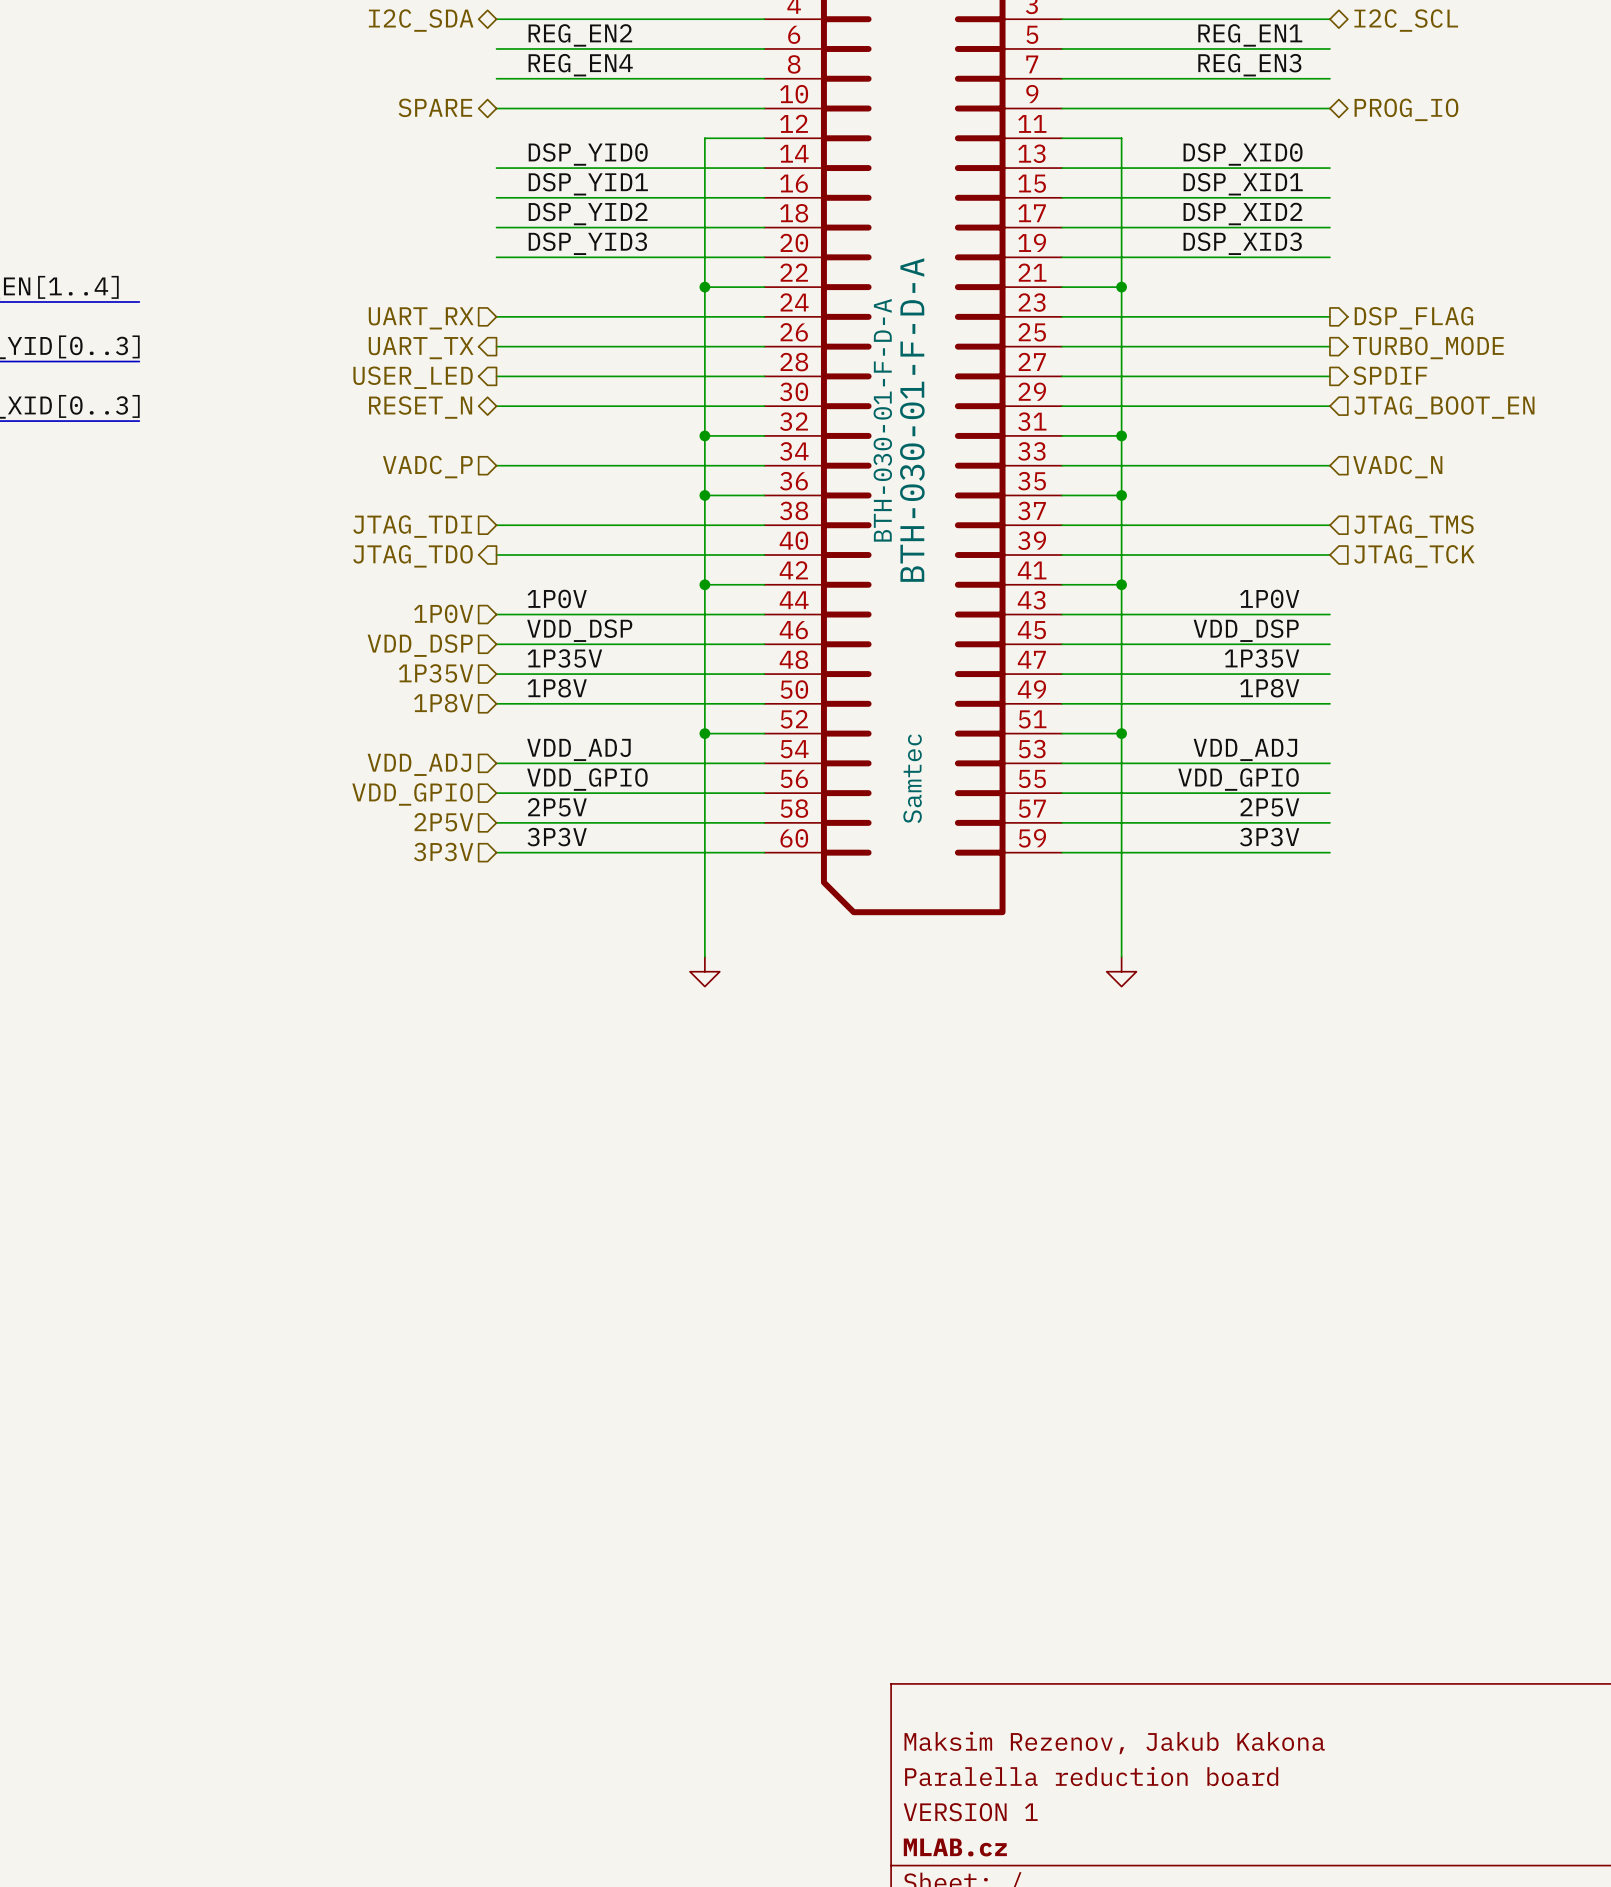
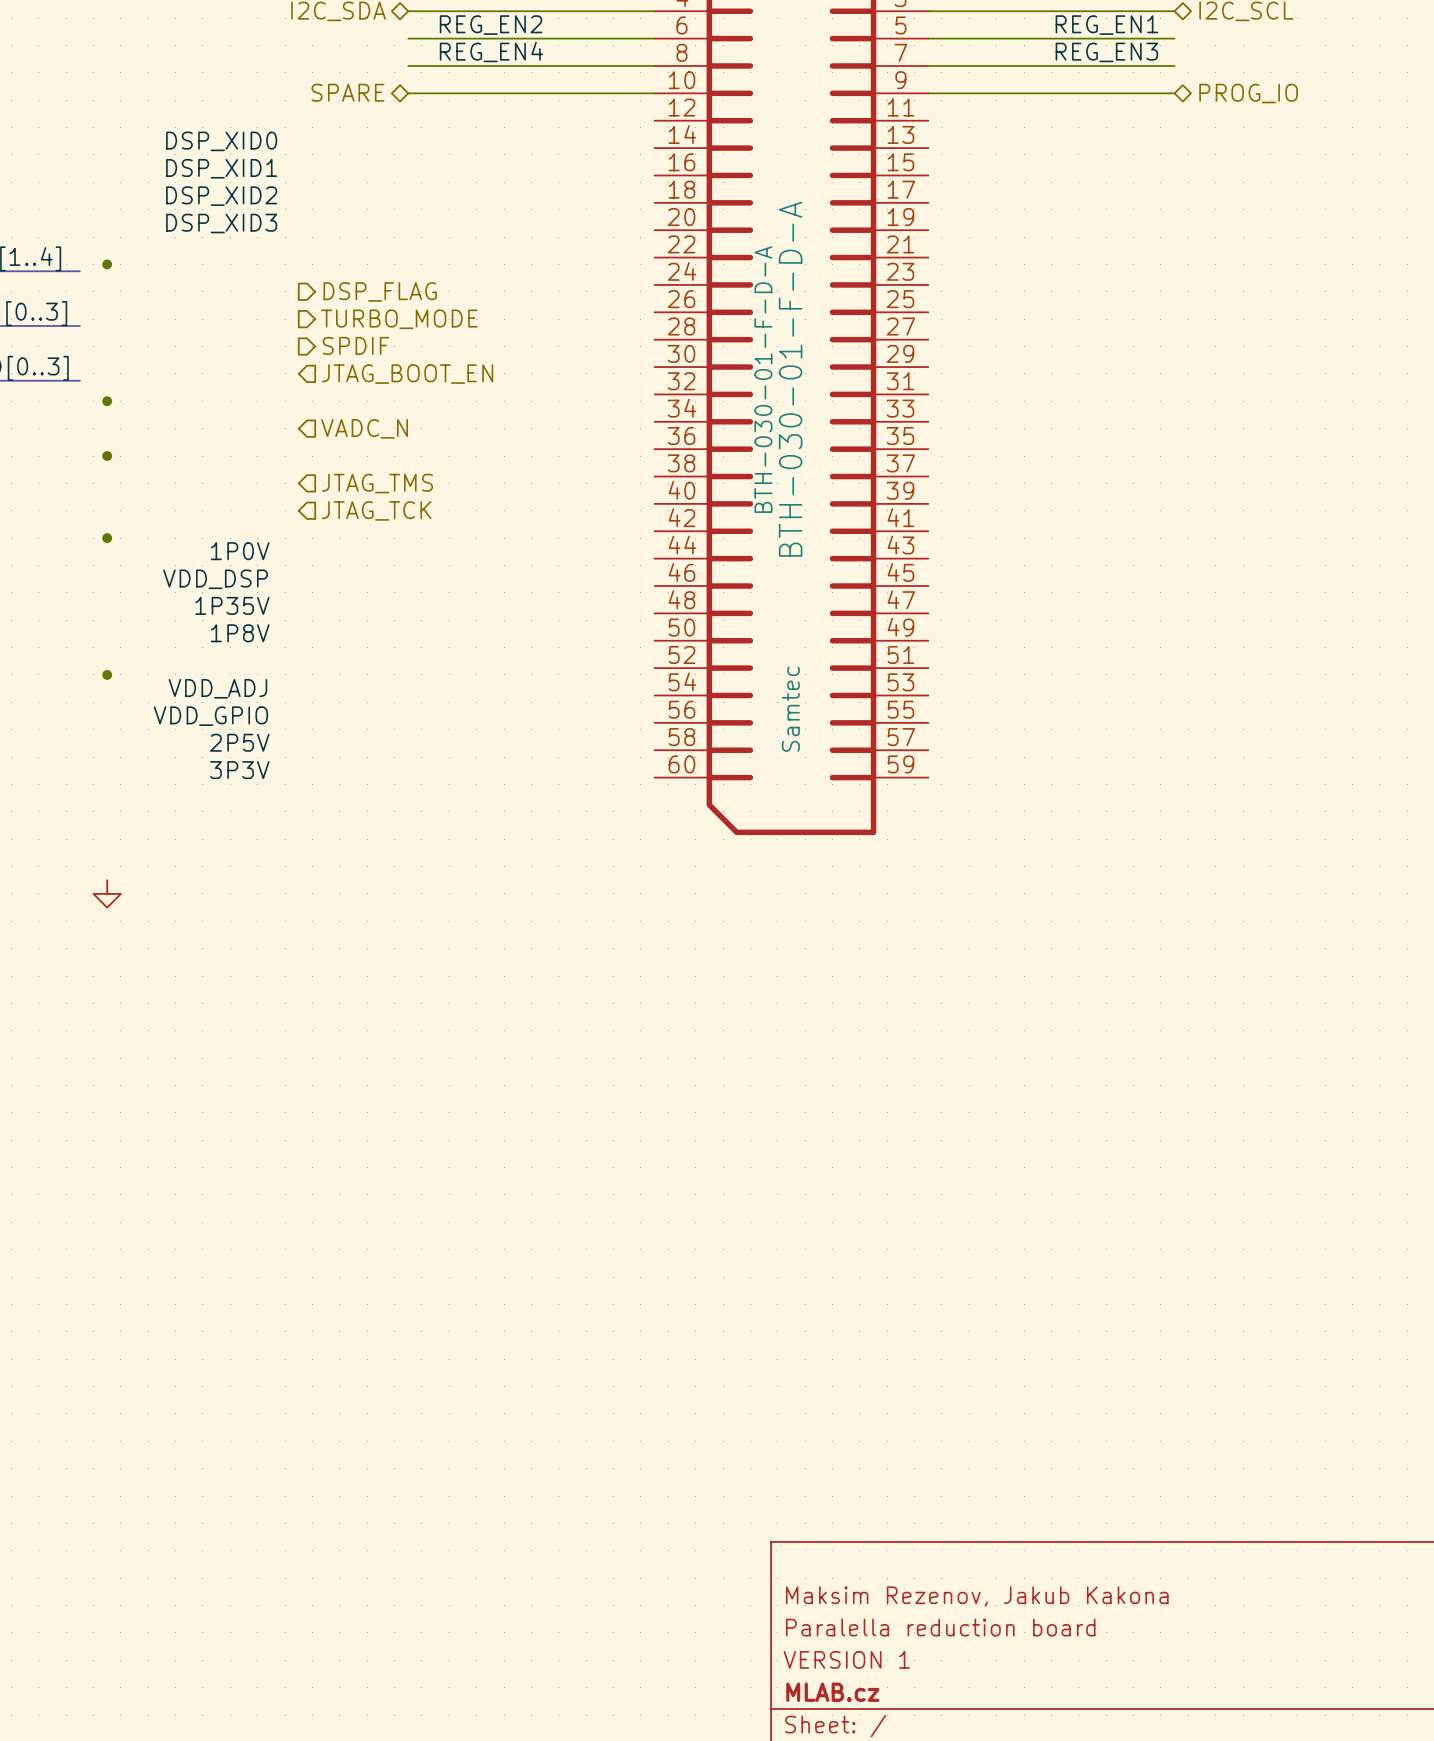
wire: (764, 138) (704, 138) (704, 956) -> none
wire: (1062, 138) (1121, 138) (1121, 956) -> none
label: DSP_YID0 (588, 154) -> none
label: DSP_XID0 (1243, 154) -> none
label: none -> DSP_XID0 (221, 141)
wire: (496, 168) (764, 168) -> none
wire: (1062, 168) (1329, 168) -> none
label: DSP_YID1 (588, 184) -> none
label: DSP_XID1 (1243, 184) -> none
label: none -> DSP_XID1 (221, 168)
wire: (496, 197) (764, 197) -> none
wire: (1062, 197) (1329, 197) -> none
label: DSP_YID2 (588, 214) -> none
label: DSP_XID2 (1242, 214) -> none
label: none -> DSP_XID2 (221, 196)
wire: (496, 227) (764, 227) -> none
wire: (1062, 227) (1329, 227) -> none
label: DSP_YID3 (587, 243) -> none
label: DSP_XID3 (1242, 243) -> none
label: none -> DSP_XID3 (221, 223)
wire: (496, 257) (764, 257) -> none
wire: (1062, 257) (1329, 257) -> none
wire: (704, 287) (764, 287) -> none
junction: (704, 287) -> none
wire: (1062, 287) (1121, 287) -> none
junction: (1121, 287) -> none
junction: none -> (107, 264)
wire: (496, 316) (764, 316) -> none
wire: (1062, 316) (1329, 316) -> none
hierarchical label: UART_RX (421, 318) -> none
hierarchical label: DSP_FLAG (1413, 318) -> none
hierarchical label: none -> DSP_FLAG (380, 291)
wire: (496, 346) (764, 346) -> none
wire: (1062, 346) (1329, 346) -> none
hierarchical label: TURBO_MODE (1428, 347) -> none
hierarchical label: UART_TX (421, 348) -> none
hierarchical label: none -> TURBO_MODE (399, 319)
hierarchical label: SPDIF (1390, 375) -> none
wire: (496, 376) (764, 376) -> none
wire: (1062, 376) (1329, 376) -> none
hierarchical label: USER_LED (413, 377) -> none
hierarchical label: none -> SPDIF (355, 345)
wire: (496, 406) (764, 406) -> none
wire: (1062, 406) (1329, 406) -> none
hierarchical label: RESET_N (420, 407) -> none
hierarchical label: JTAG_BOOT_EN (1444, 407) -> none
hierarchical label: none -> JTAG_BOOT_EN (407, 374)
wire: (704, 435) (764, 435) -> none
junction: (704, 435) -> none
wire: (1062, 435) (1121, 435) -> none
junction: (1121, 435) -> none
junction: none -> (107, 401)
wire: (496, 465) (764, 465) -> none
wire: (1062, 465) (1329, 465) -> none
hierarchical label: VADC_P (427, 467) -> VADC_N (364, 428)
hierarchical label: VADC_N (1397, 467) -> none
wire: (704, 495) (764, 495) -> none
junction: (704, 495) -> none
wire: (1062, 495) (1121, 495) -> none
junction: (1121, 495) -> none
junction: none -> (107, 456)
wire: (496, 525) (764, 525) -> none
wire: (1062, 525) (1329, 525) -> none
hierarchical label: JTAG_TDI (412, 526) -> none
hierarchical label: JTAG_TMS (1413, 526) -> none
hierarchical label: none -> JTAG_TMS (377, 483)
wire: (496, 555) (764, 555) -> none
wire: (1062, 555) (1329, 555) -> none
hierarchical label: JTAG_TDO (413, 556) -> none
hierarchical label: JTAG_TCK (1414, 556) -> none
hierarchical label: none -> JTAG_TCK (376, 510)
wire: (704, 584) (764, 584) -> none
junction: (704, 584) -> none
wire: (1062, 584) (1121, 584) -> none
junction: (1121, 584) -> none
junction: none -> (107, 538)
label position: 1P0V (557, 598) -> 1P0V (240, 551)
label: 1P0V (1269, 598) -> none
hierarchical label: 1P0V (443, 613) -> none
wire: (496, 614) (764, 614) -> none
wire: (1062, 614) (1329, 614) -> none
label position: VDD_DSP (579, 630) -> VDD_DSP (215, 579)
label: VDD_DSP (1246, 630) -> none
wire: (496, 644) (764, 644) -> none
wire: (1062, 644) (1329, 644) -> none
hierarchical label: VDD_DSP (420, 645) -> none
label position: 1P35V (564, 658) -> 1P35V (232, 605)
label: 1P35V (1262, 658) -> none
hierarchical label: 1P35V (436, 673) -> none
wire: (496, 674) (764, 674) -> none
wire: (1062, 674) (1329, 674) -> none
label position: 1P8V (557, 688) -> 1P8V (240, 633)
label: 1P8V (1269, 688) -> none
hierarchical label: 1P8V (443, 703) -> none
wire: (496, 703) (764, 703) -> none
wire: (1062, 703) (1329, 703) -> none
wire: (704, 733) (764, 733) -> none
junction: (704, 733) -> none
wire: (1062, 733) (1121, 733) -> none
junction: (1121, 733) -> none
junction: none -> (107, 674)
label position: VDD_ADJ (578, 749) -> VDD_ADJ (217, 688)
label: VDD_ADJ (1245, 749) -> none
wire: (496, 763) (764, 763) -> none
wire: (1062, 763) (1329, 763) -> none
hierarchical label: VDD_ADJ (419, 764) -> none
label position: VDD_GPIO (587, 779) -> VDD_GPIO (210, 716)
label: VDD_GPIO (1238, 779) -> none
wire: (496, 793) (764, 793) -> none
wire: (1062, 793) (1329, 793) -> none
hierarchical label: VDD_GPIO (412, 794) -> none
label position: 2P5V (557, 807) -> 2P5V (239, 742)
label: 2P5V (1269, 807) -> none
hierarchical label: 2P5V (443, 822) -> none
wire: (496, 822) (764, 822) -> none
wire: (1062, 822) (1329, 822) -> none
label position: 3P3V (557, 837) -> 3P3V (239, 770)
label: 3P3V (1269, 837) -> none
hierarchical label: 3P3V (443, 851) -> none
wire: (496, 852) (764, 852) -> none
wire: (1062, 852) (1329, 852) -> none
power symbol: (704, 971) -> none
power symbol: (1121, 971) -> none
power symbol: none -> (107, 893)

